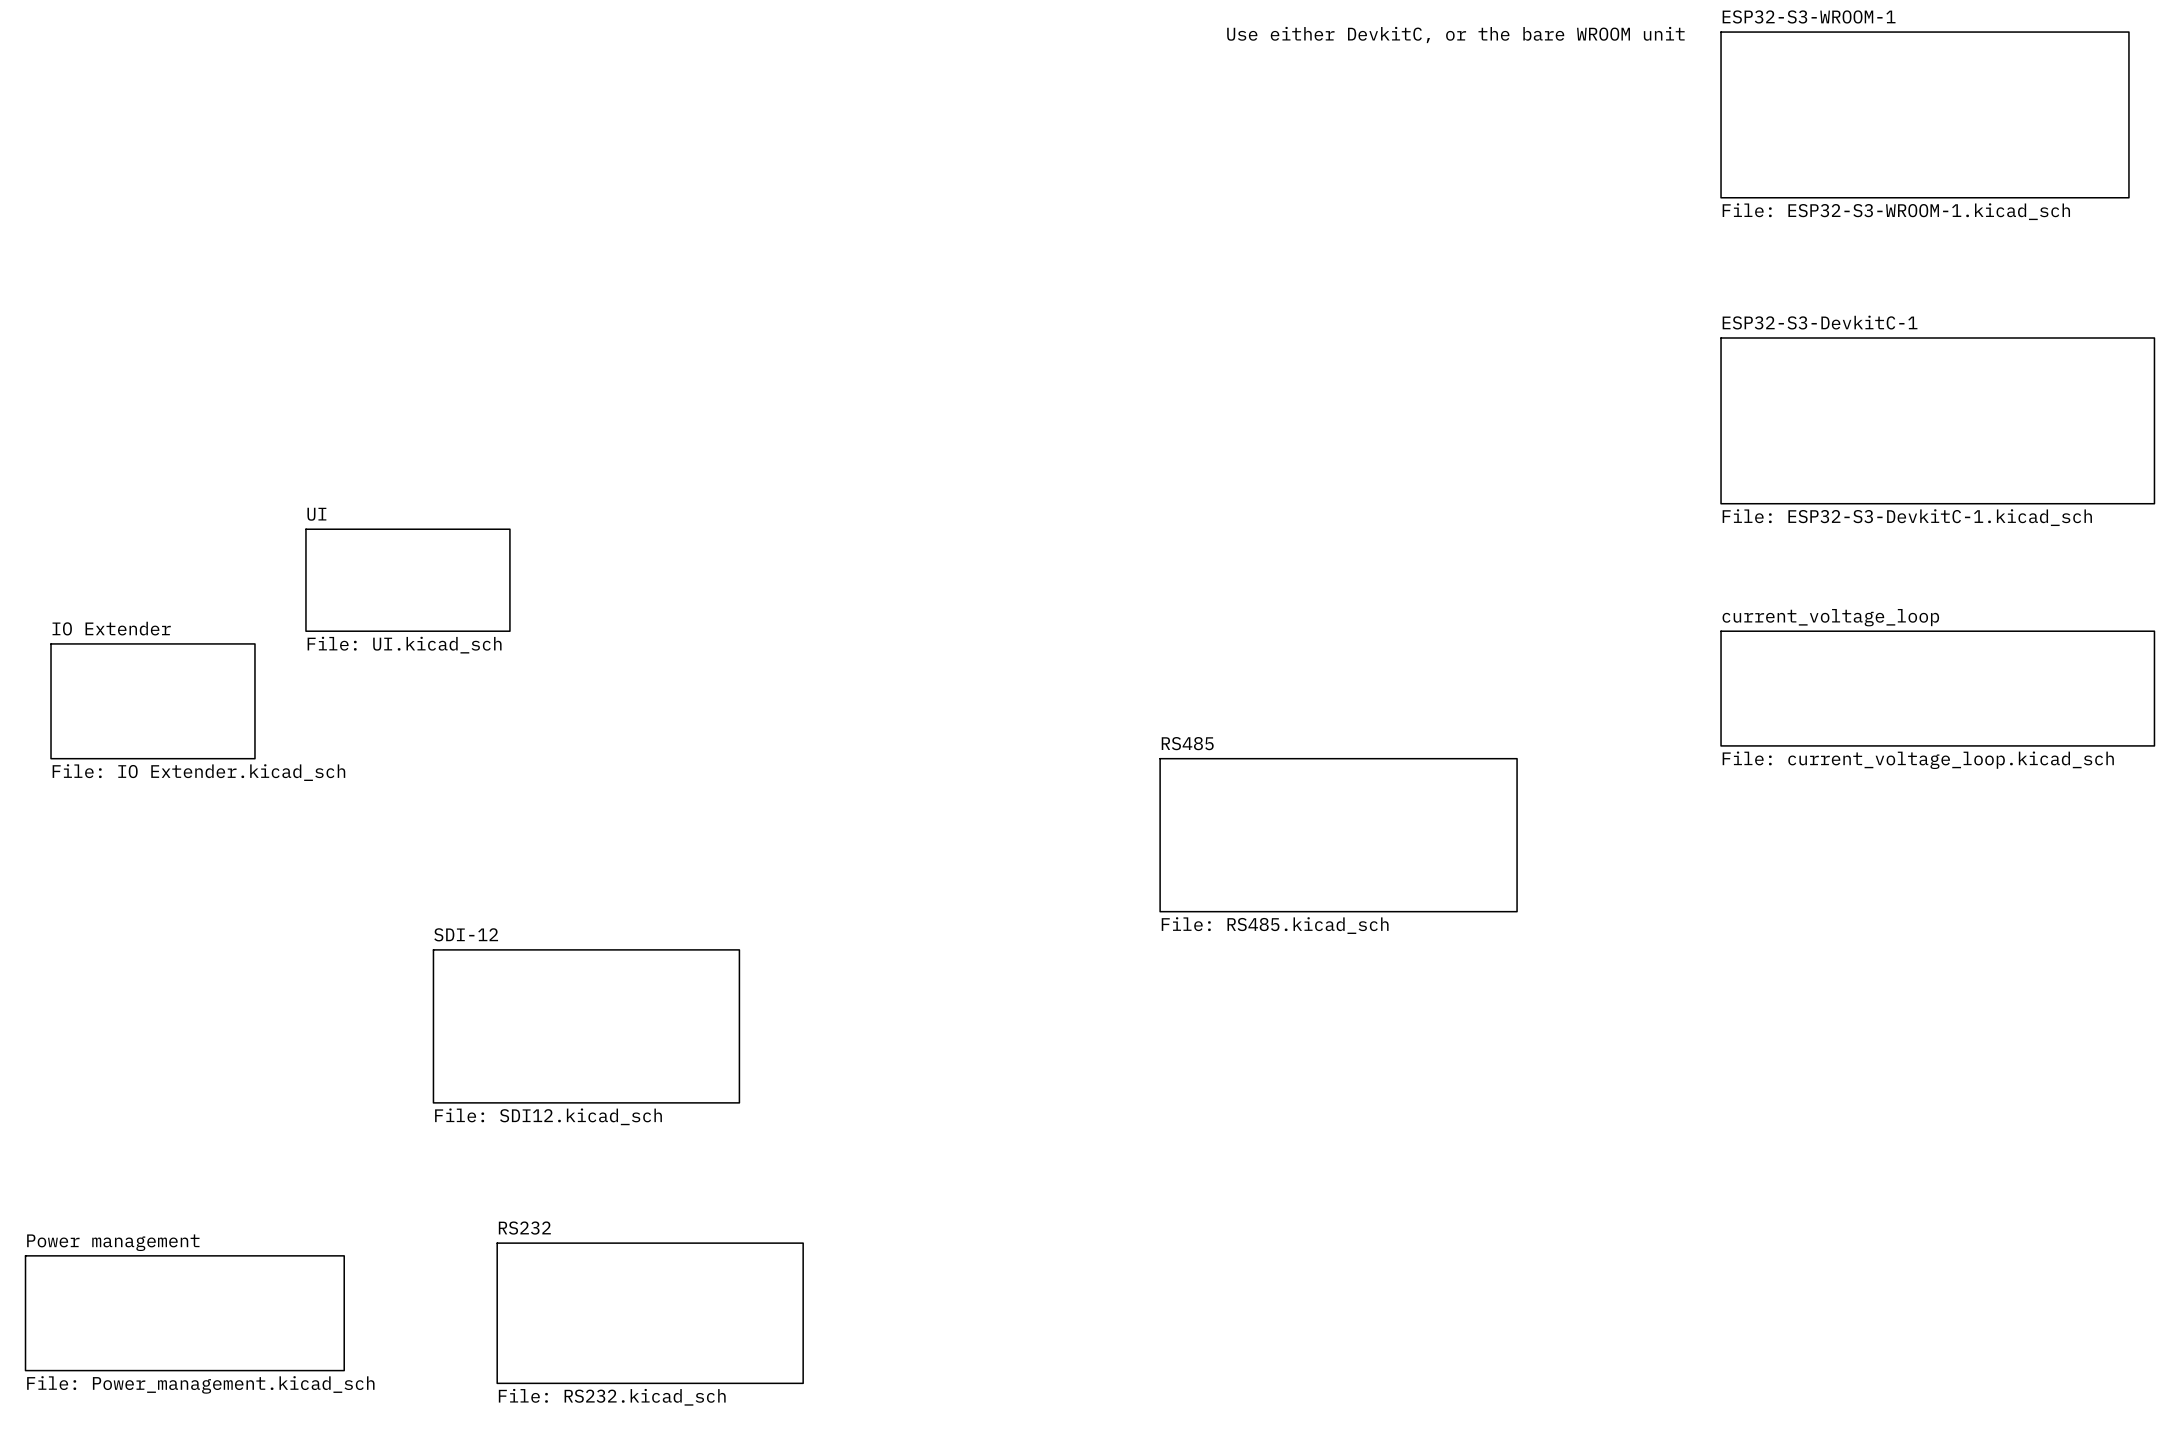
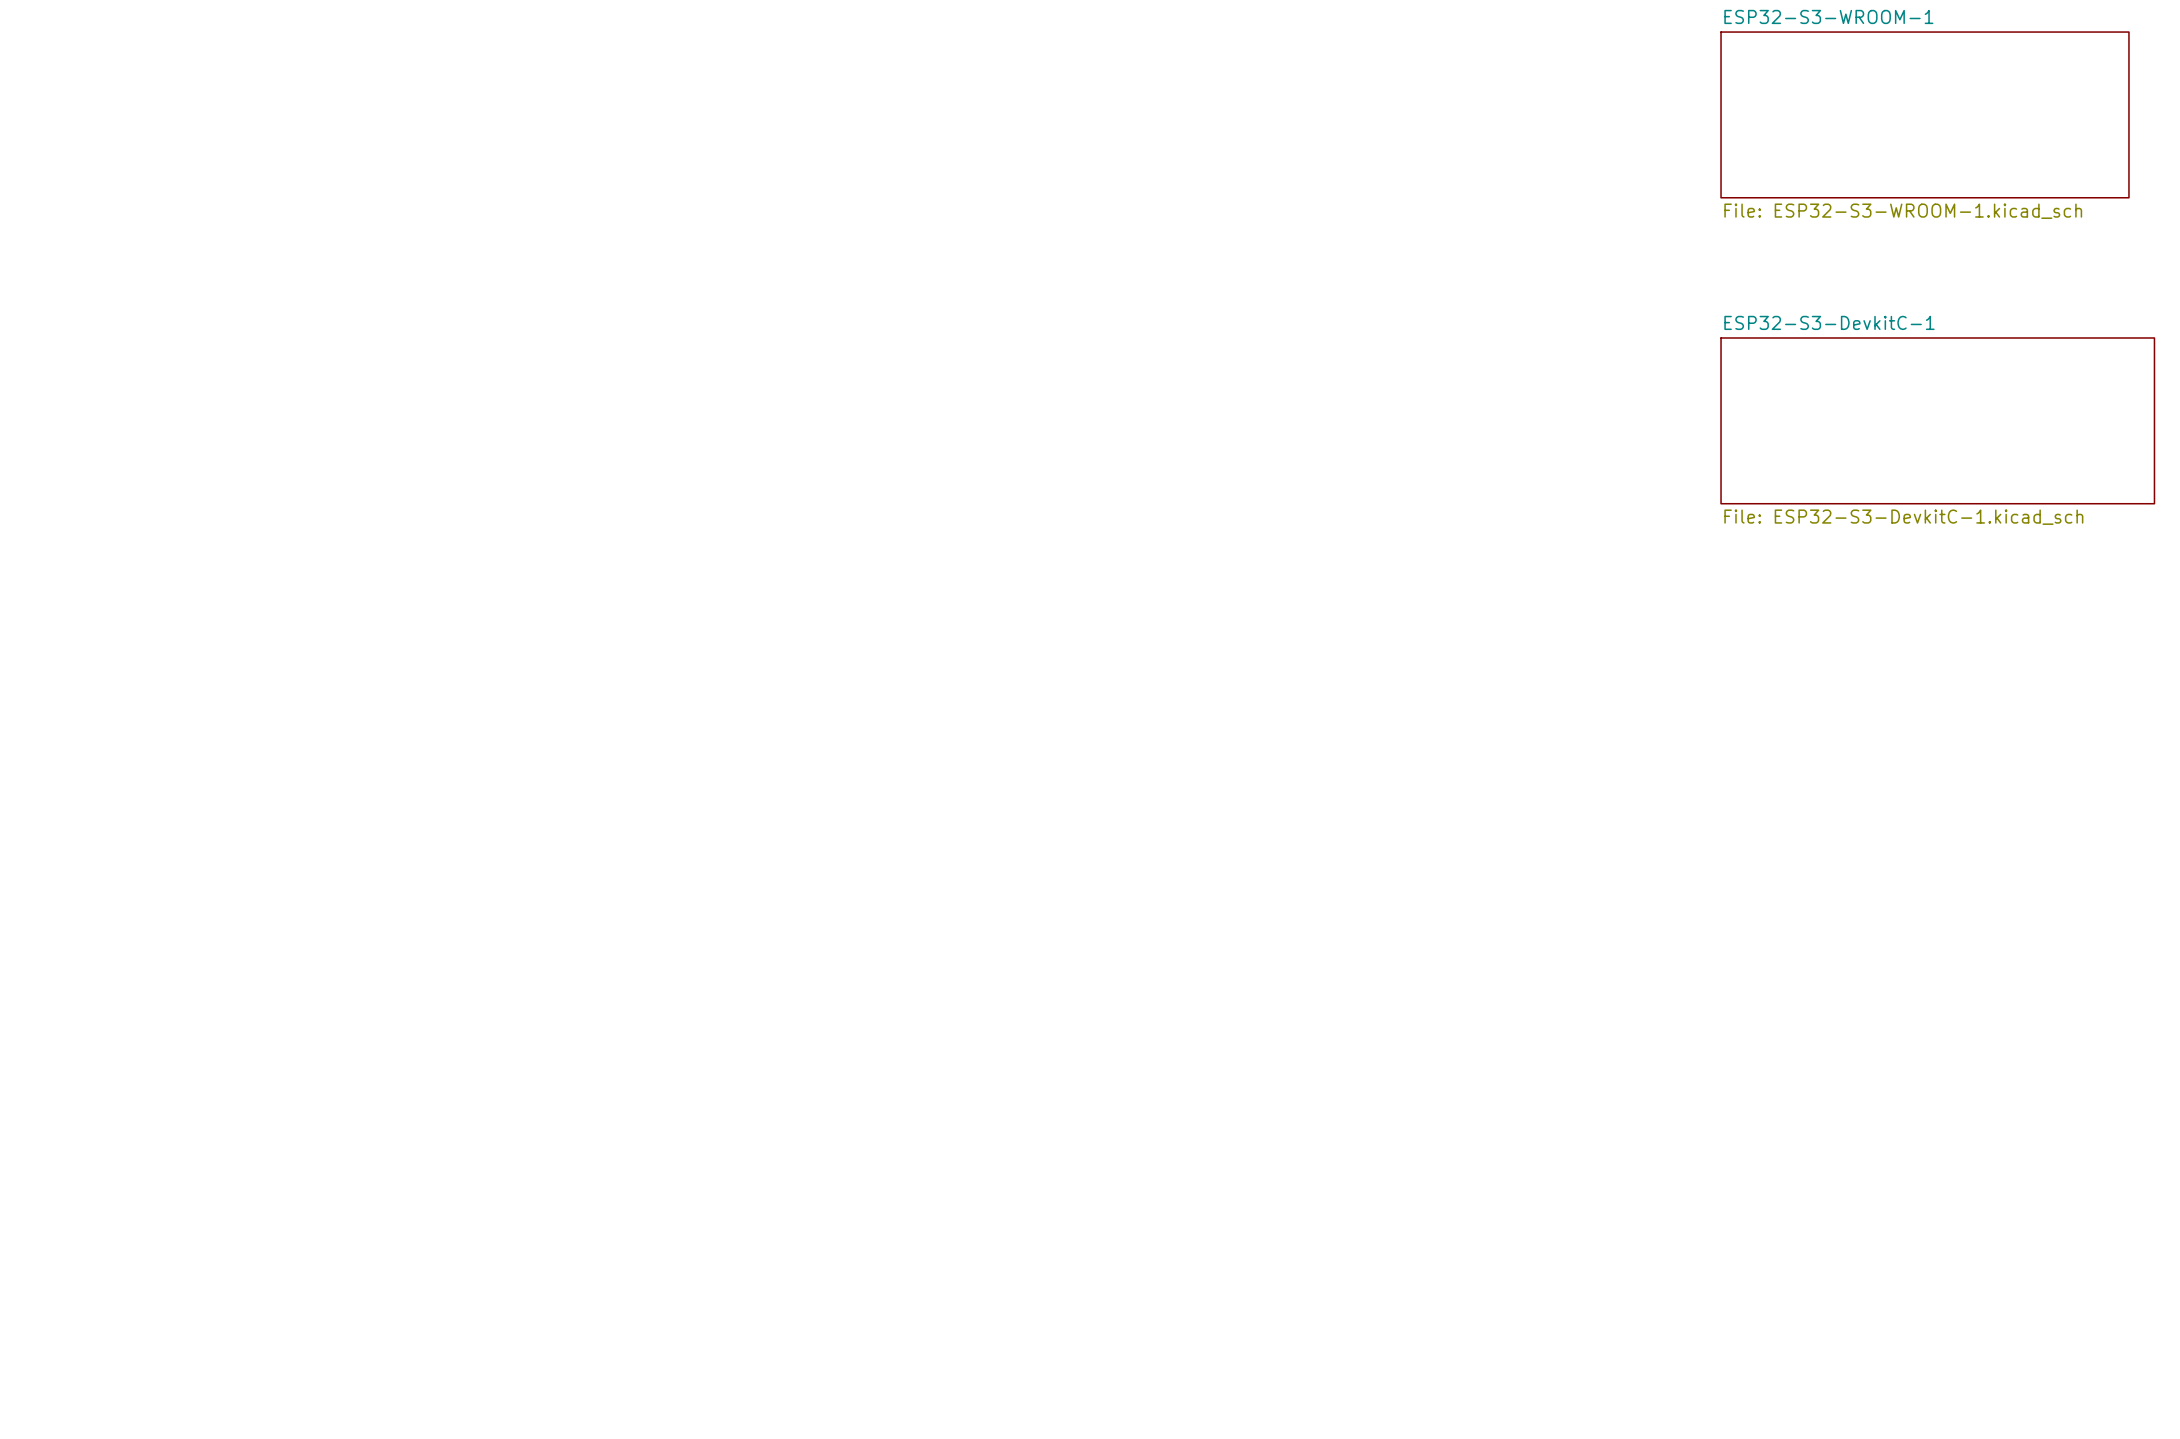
text: Use either DevkitC, or the bare WROOM unit (1455, 34) -> none
sheet UI: File: UI.kicad_sch (407, 580) -> none
sheet current_voltage_loop: File: current_voltage_loop.kicad_sch (1937, 688) -> none
sheet IO Extender: File: IO Extender.kicad_sch (152, 701) -> none
sheet RS485: File: RS485.kicad_sch (1338, 835) -> none
sheet SDI-12: File: SDI12.kicad_sch (586, 1026) -> none
sheet Power management: File: Power_management.kicad_sch (184, 1313) -> none
sheet RS232: File: RS232.kicad_sch (650, 1313) -> none

